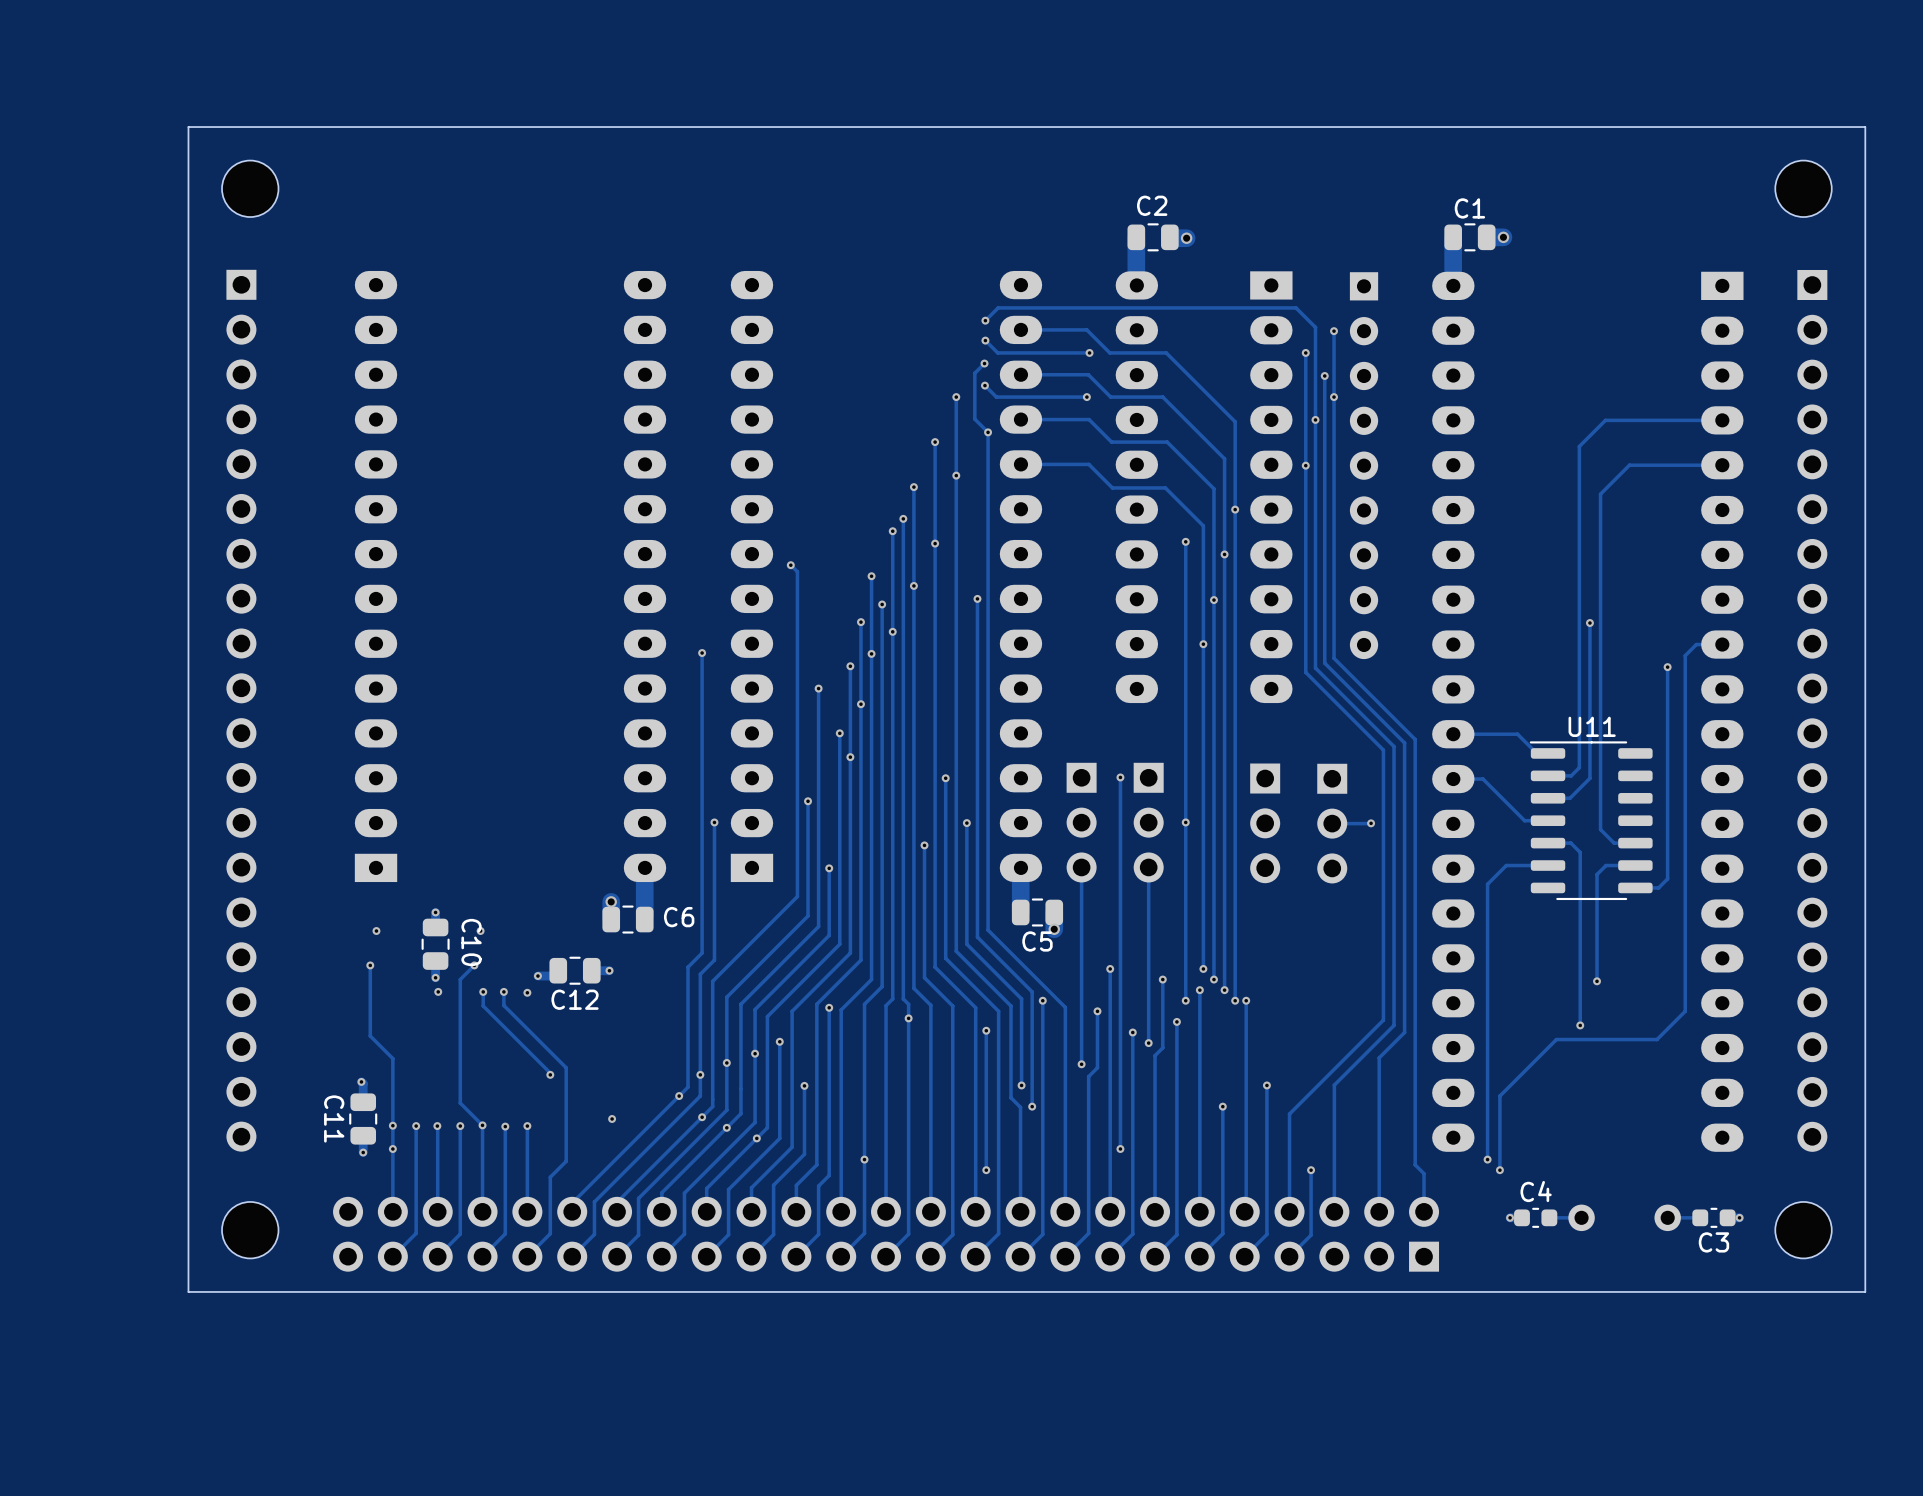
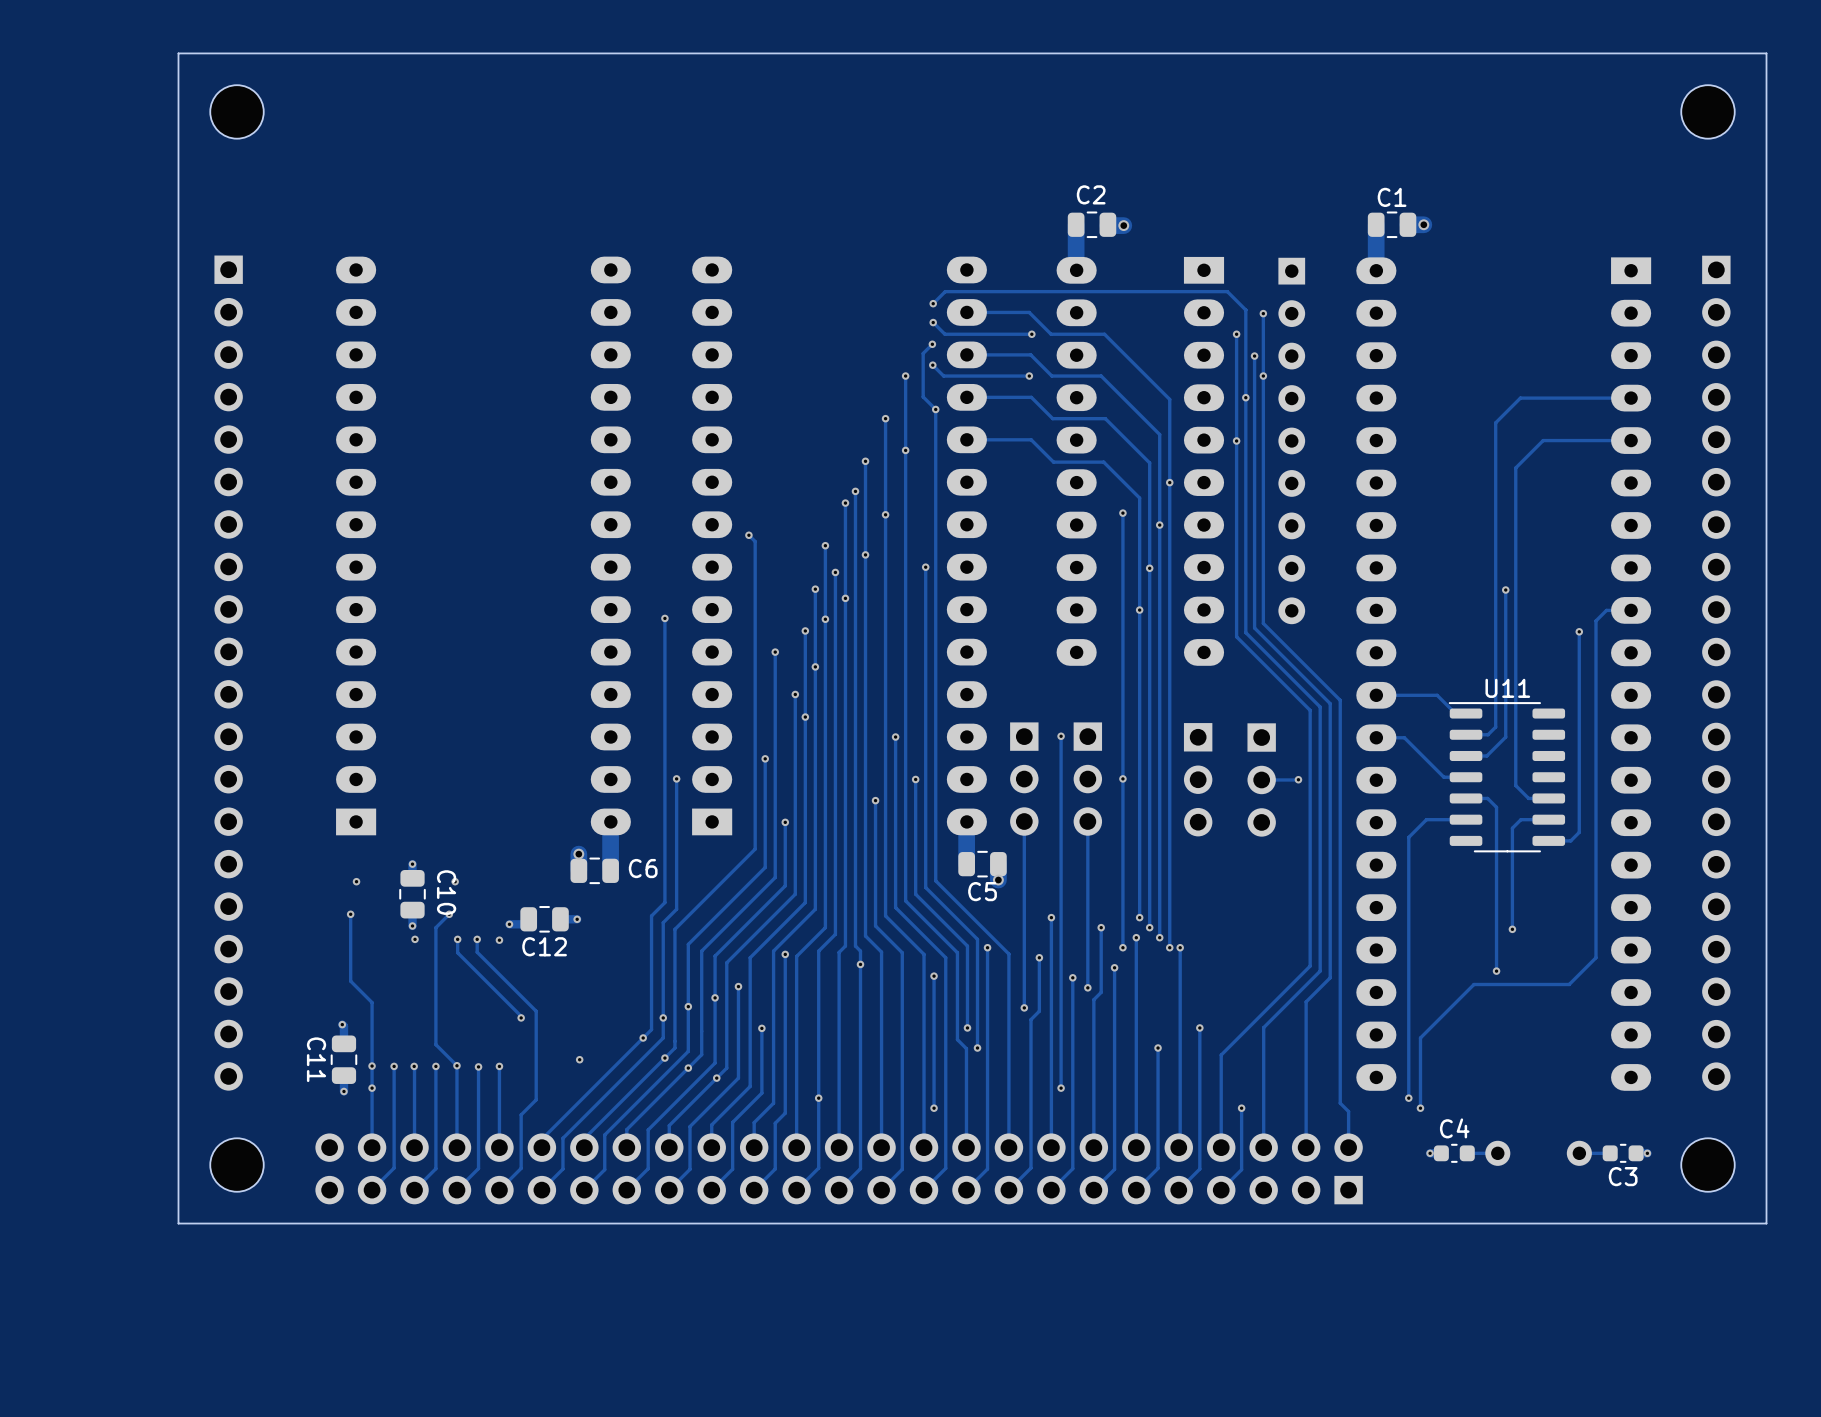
board edge: (1865, 127) (188, 127) -> (1766, 120) (1766, 53) (178, 53) (178, 120)
part position: (250, 188) -> (237, 111)
part position: (1803, 188) -> (1707, 111)

